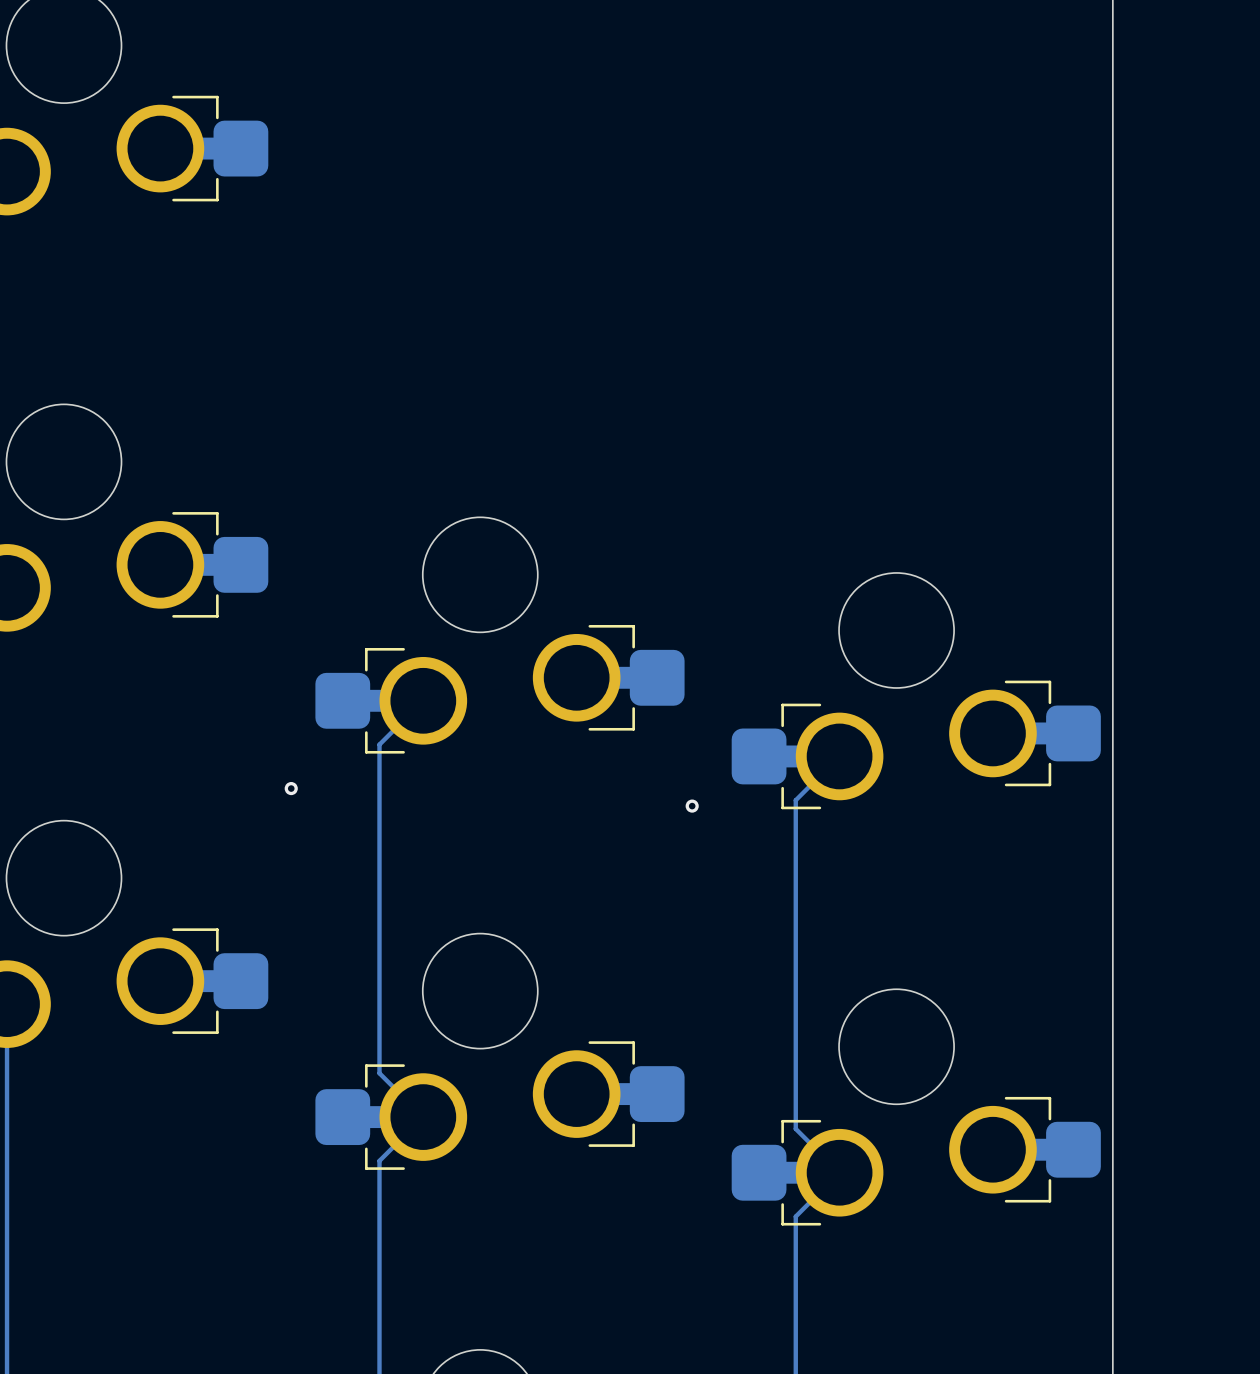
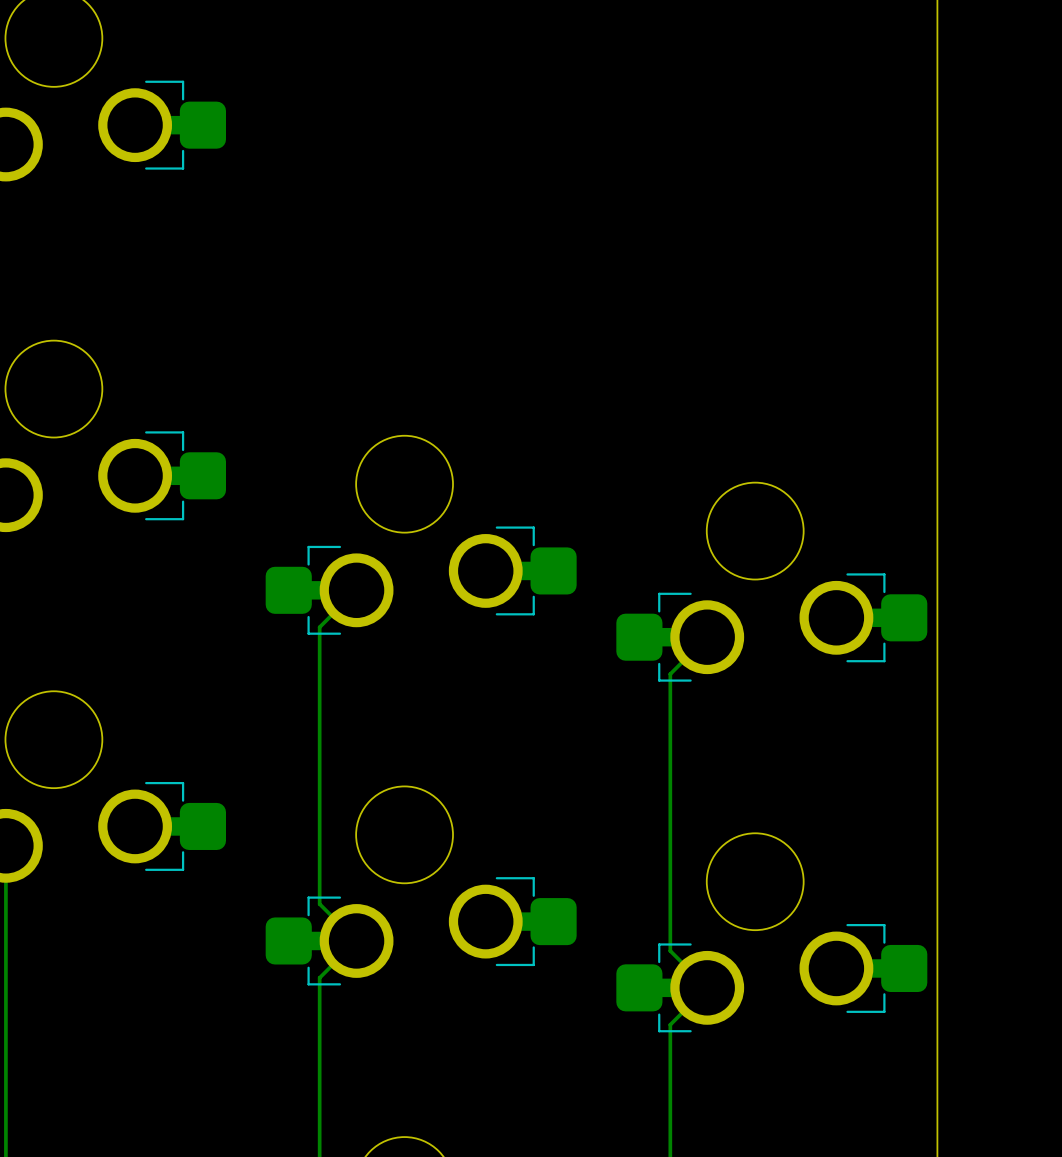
via: (291, 788) -> none
via: (692, 806) -> none

